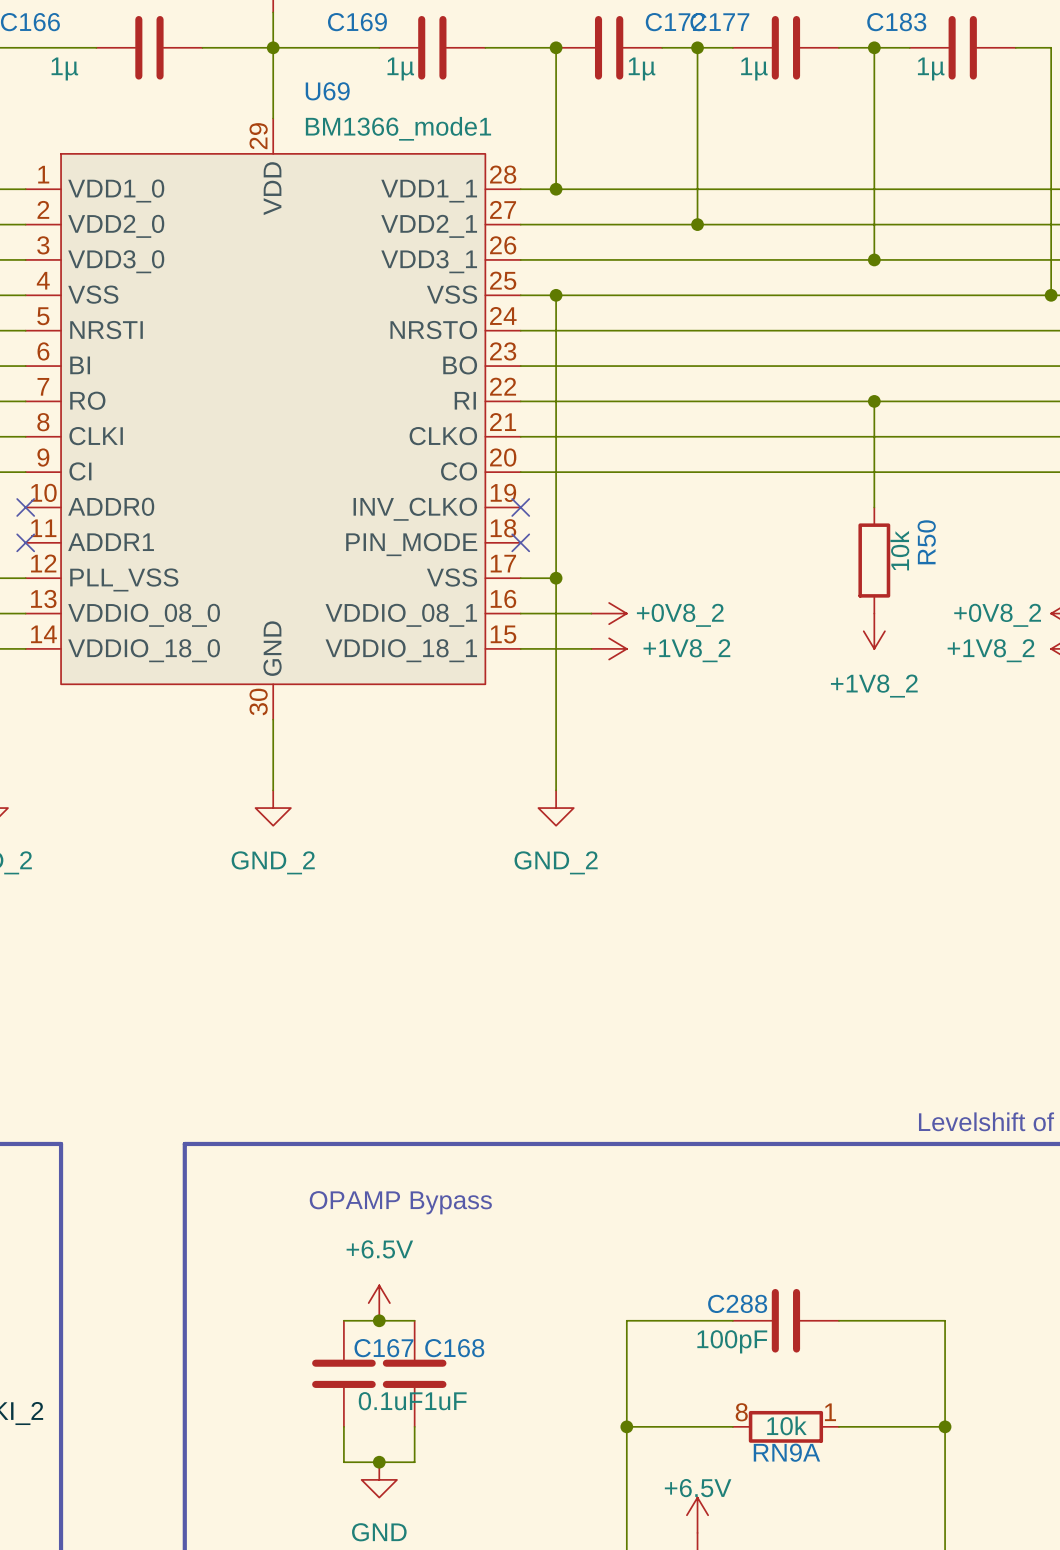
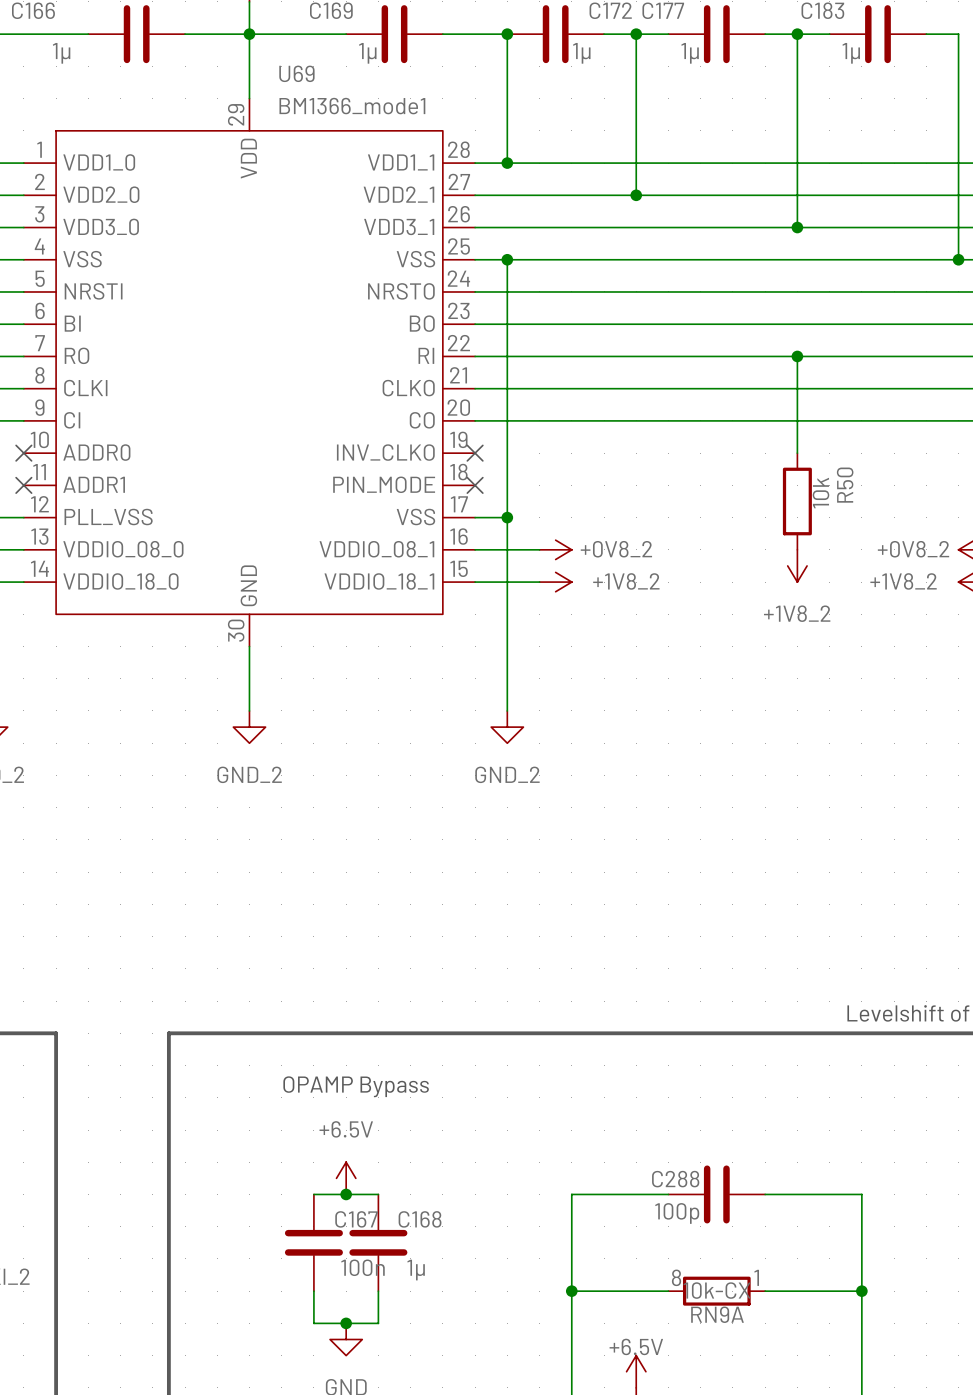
C288 value: 100pF (732, 1341) -> 100p (677, 1213)
C167 value: 0.1uF (390, 1401) -> 100n (363, 1267)
C168 value: 1uF (446, 1401) -> 1µ (416, 1270)
RN9A value: 10k (786, 1425) -> 10k-CX (717, 1290)

